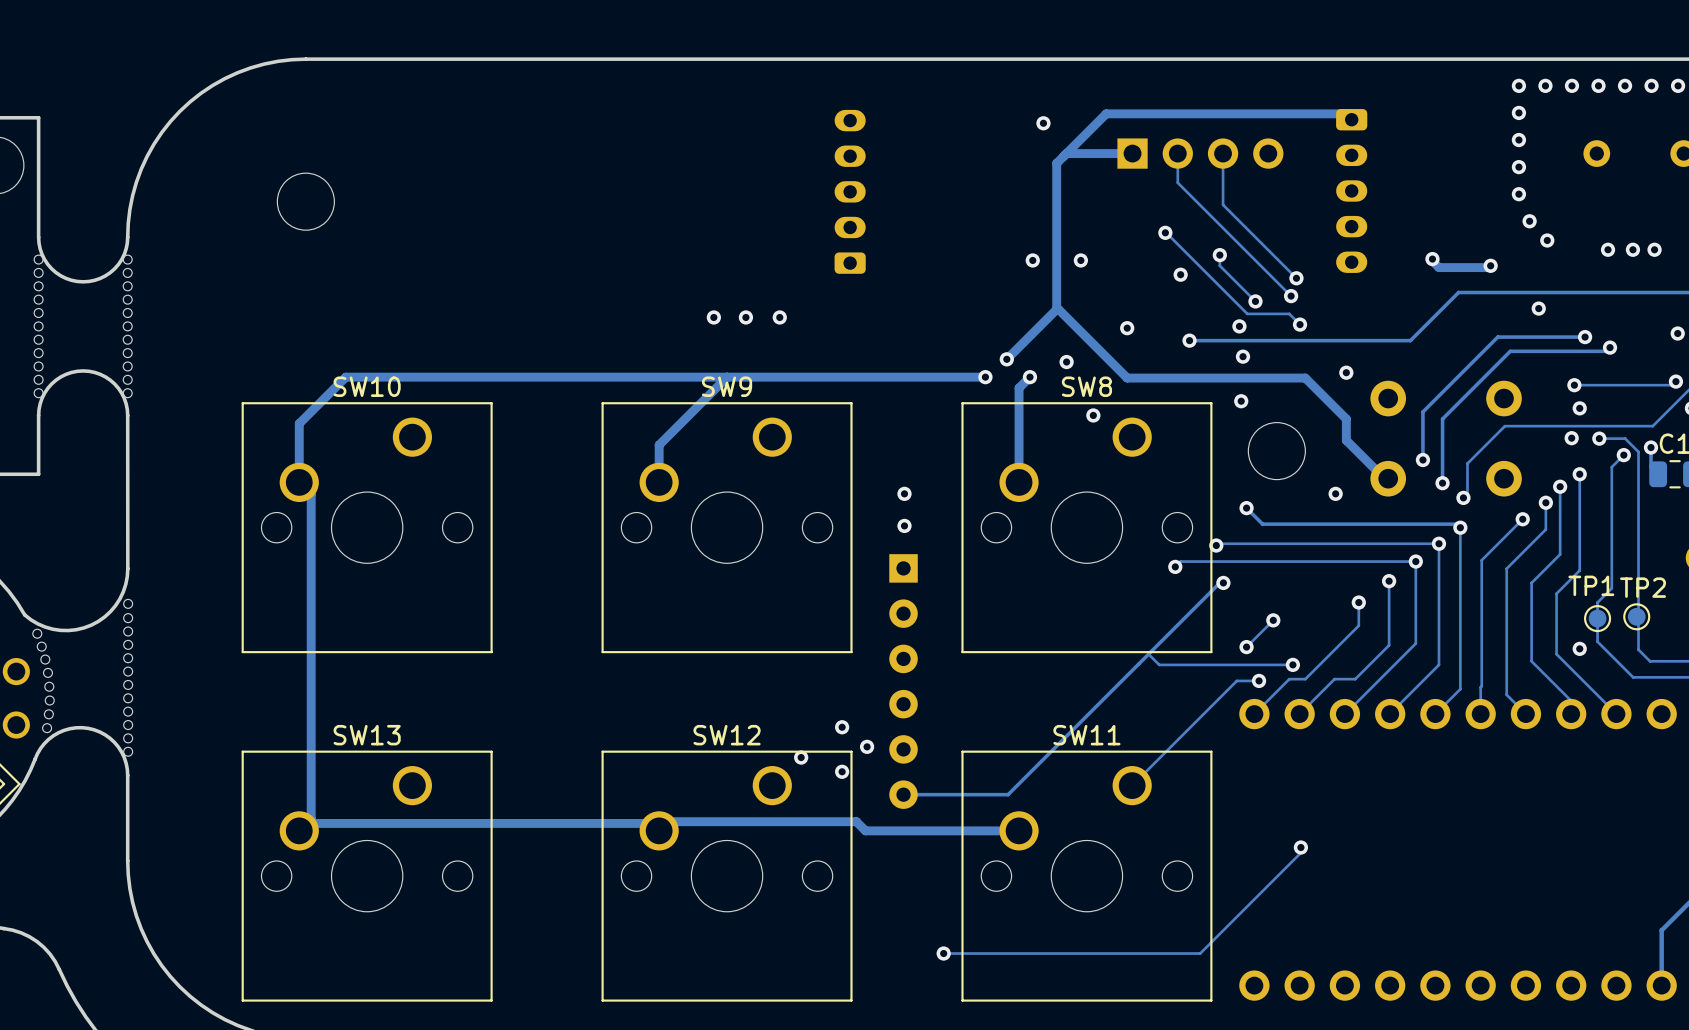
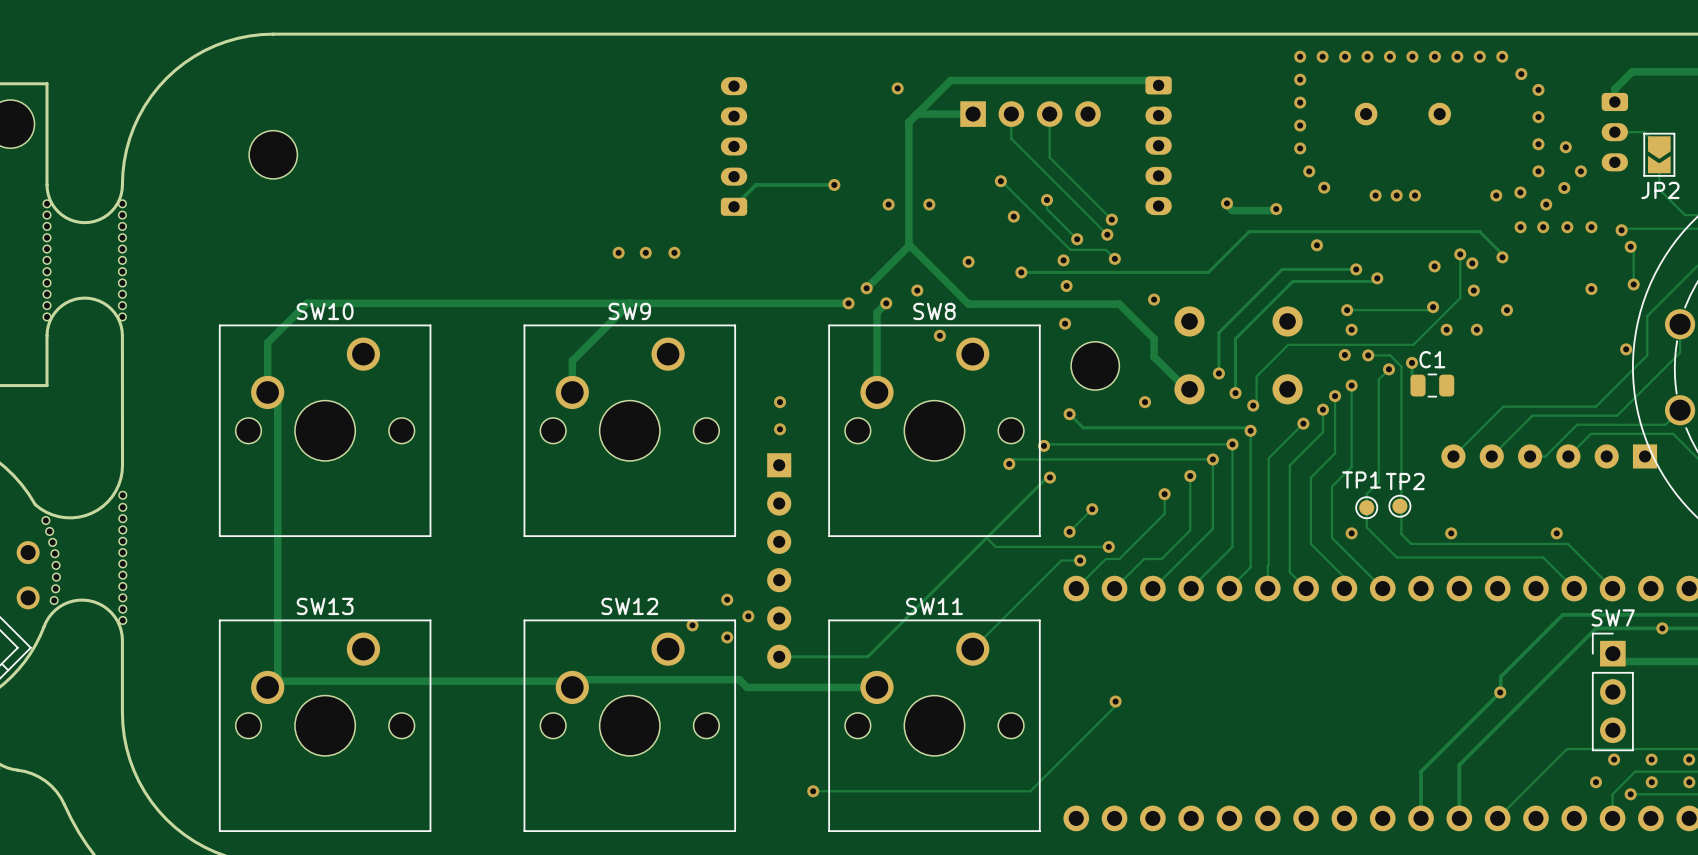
track: none -> (834, 184) (755, 184) (734, 206)
via: none -> (834, 184)

